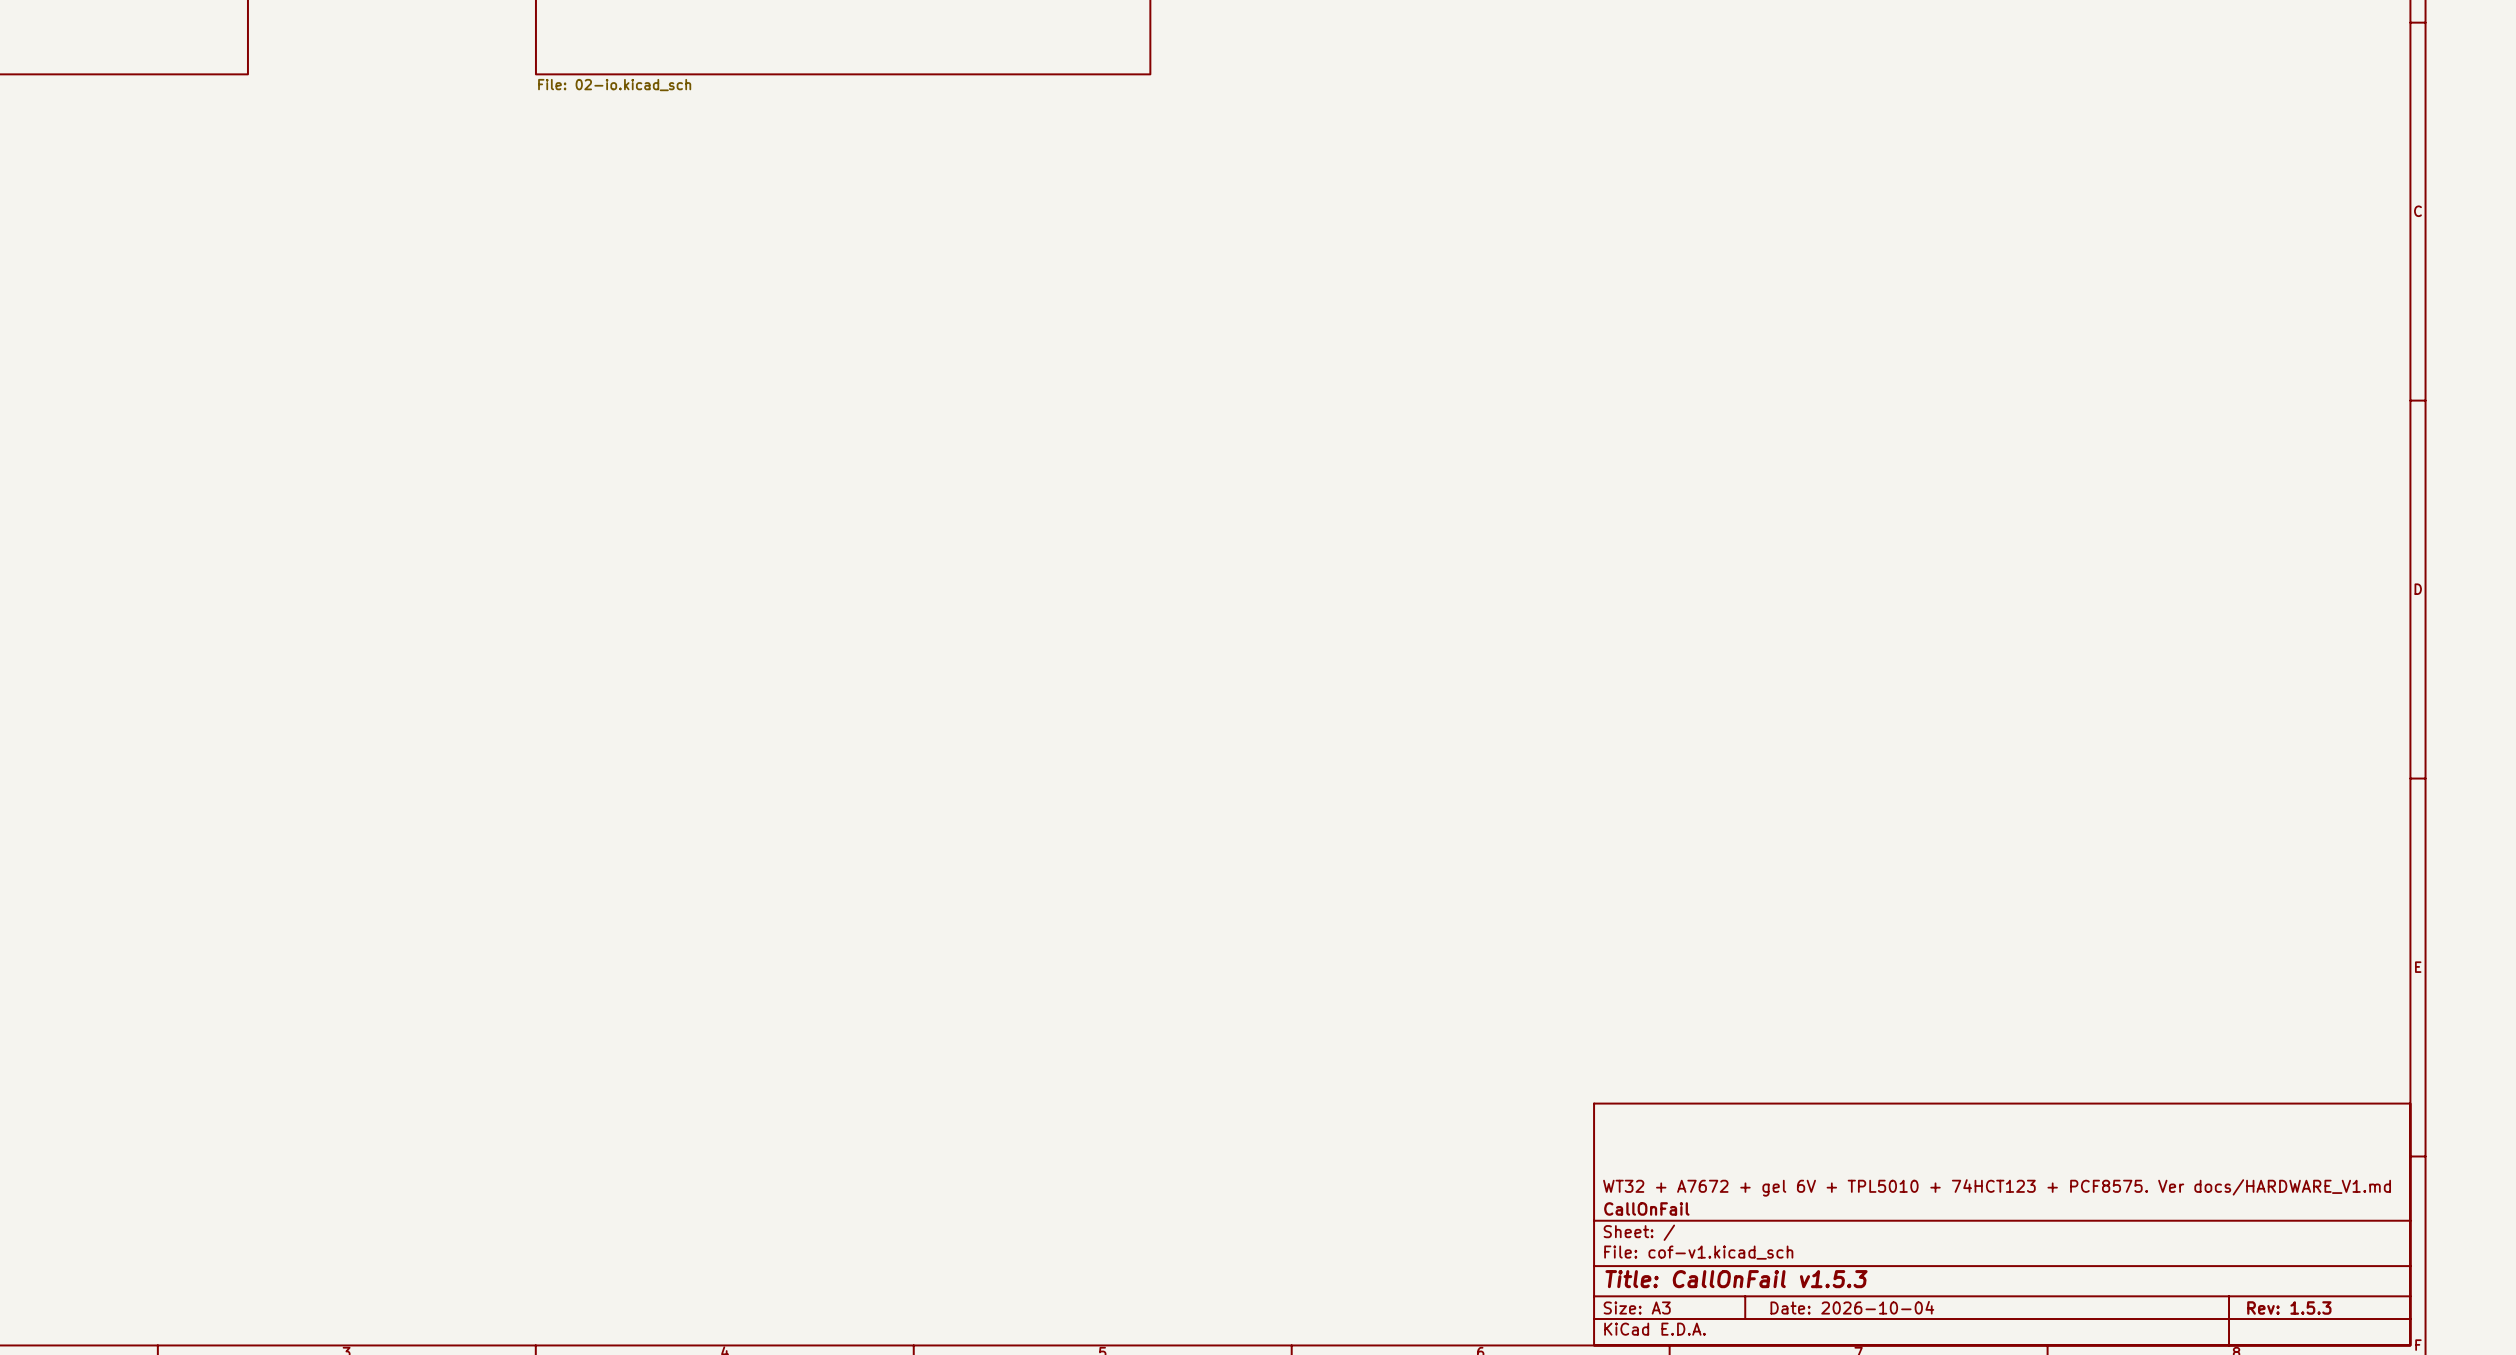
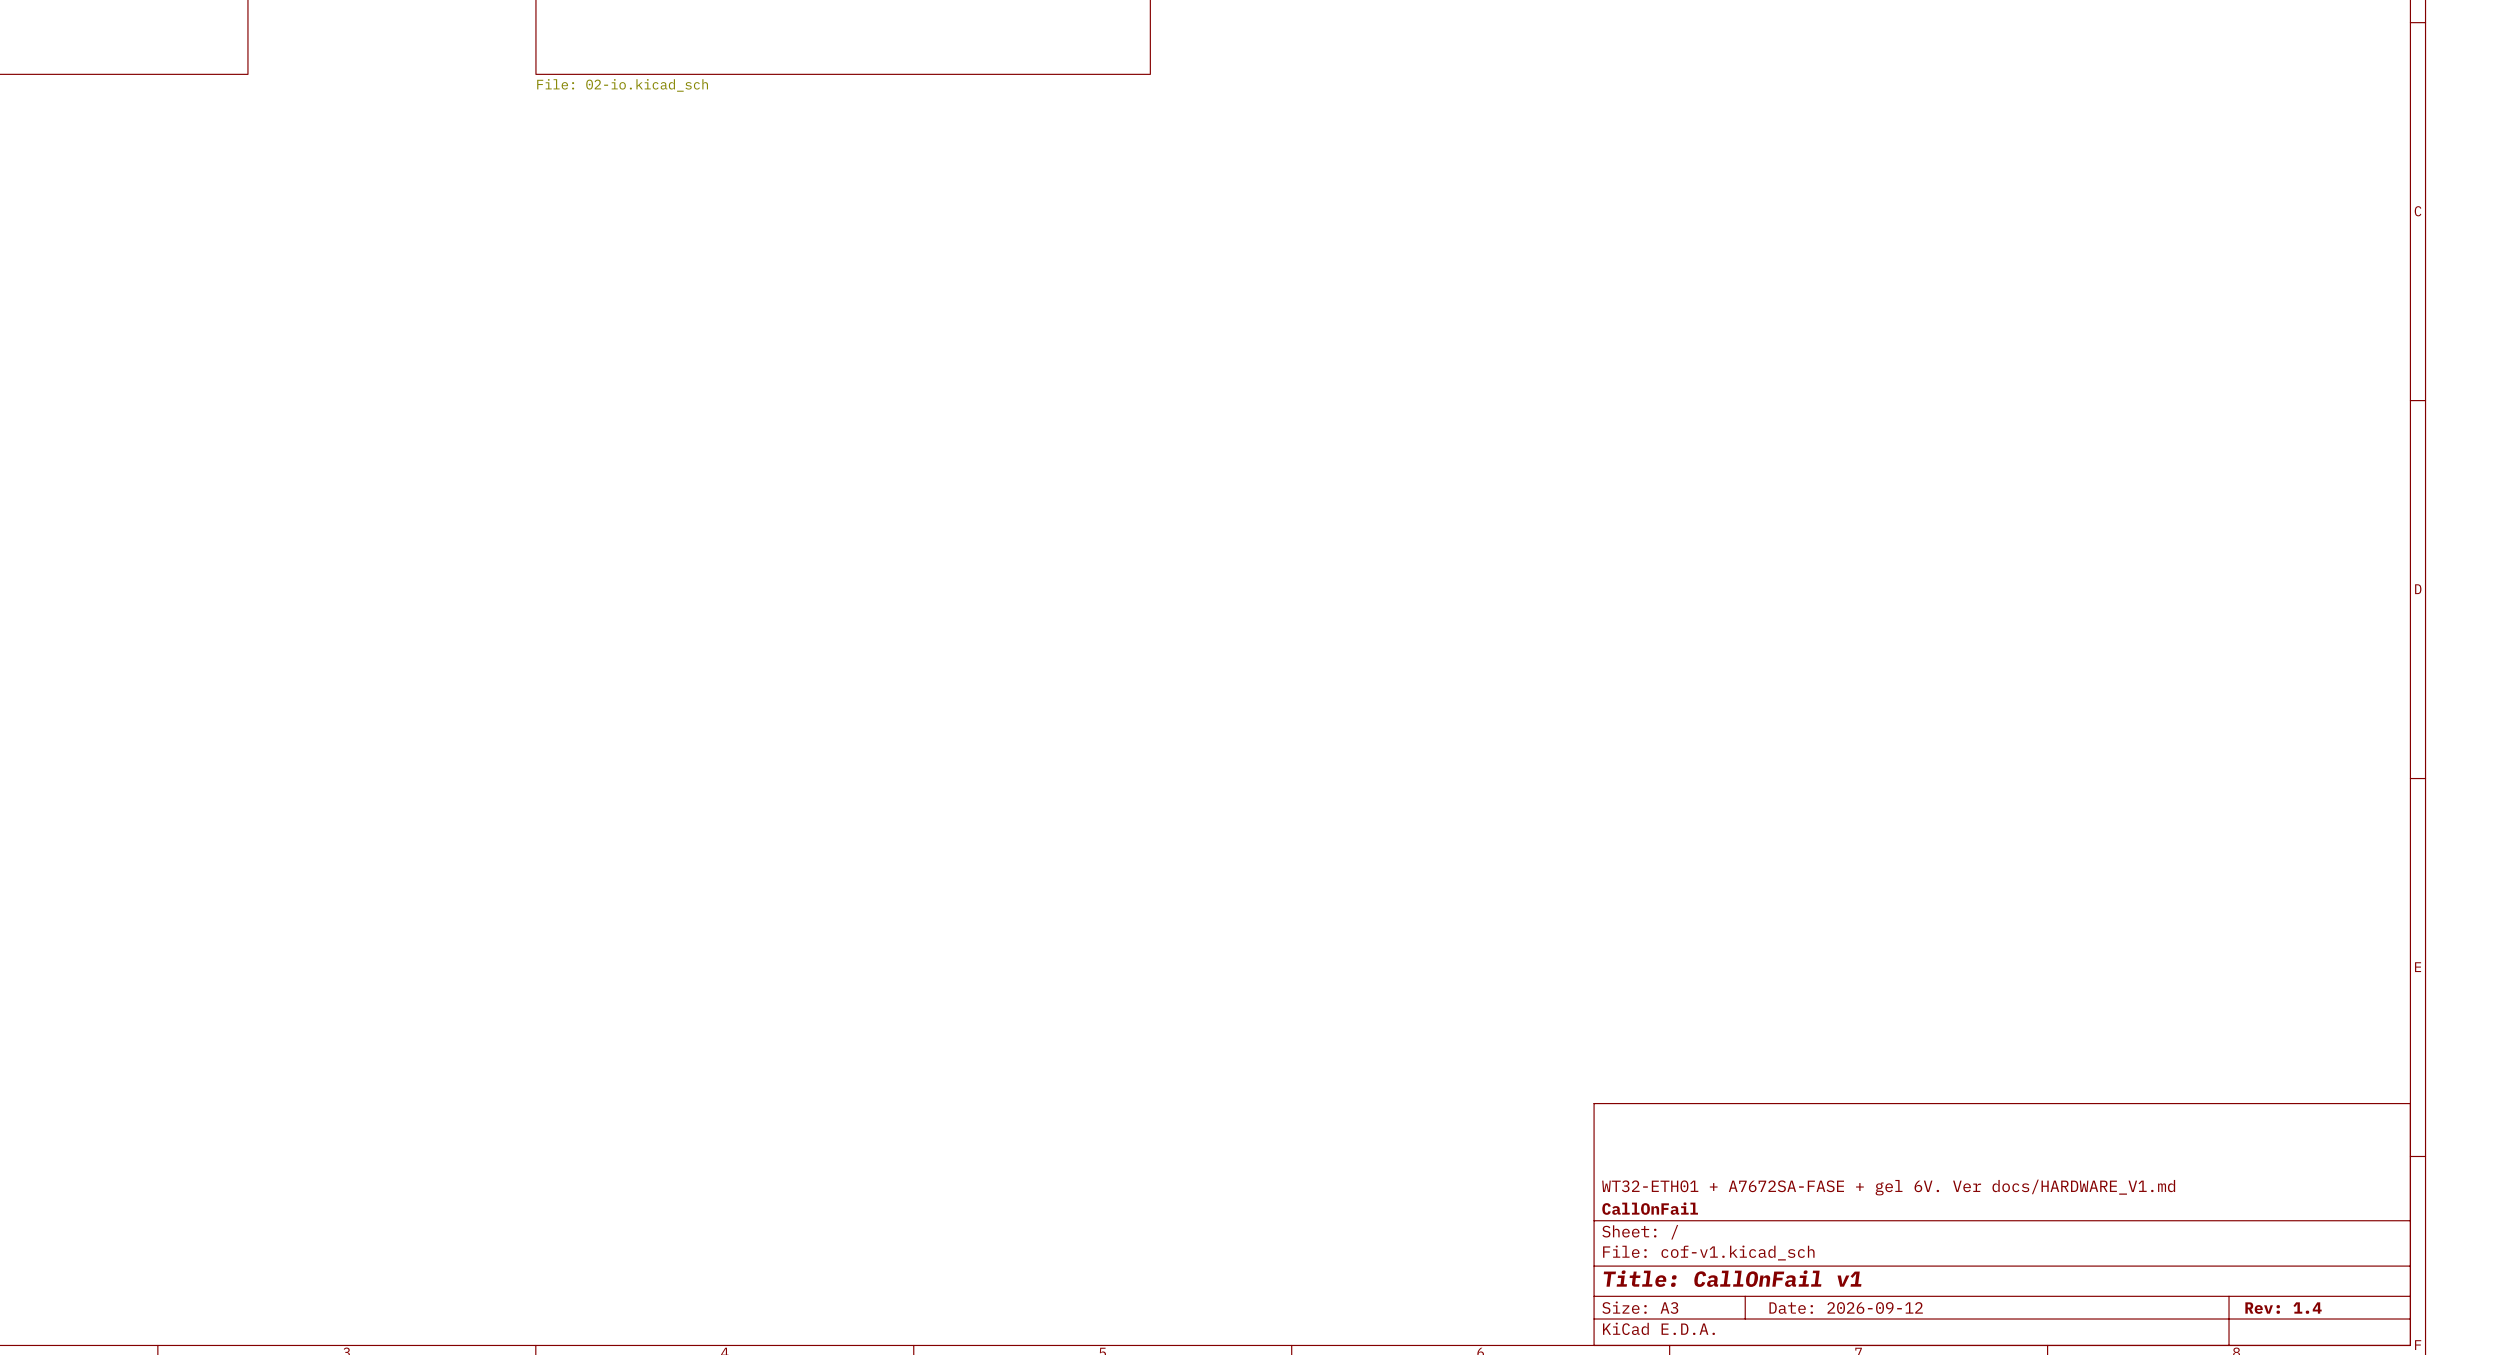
title block: WT32 + A7672 + gel 6V + TPL5010 + 74HCT123 + PCF8575. Ver docs/HARDWARE_V1.md (1997, 1187) -> WT32-ETH01 + A7672SA-FASE + gel 6V. Ver docs/HARDWARE_V1.md (1888, 1187)
title block: Title: CallOnFail v1.5.3 (1736, 1279) -> Title: CallOnFail v1 (1732, 1278)
title block: Date: 2026-10-04 (1852, 1307) -> Date: 2026-09-12 (1846, 1307)
title block: Rev: 1.5.3 (2289, 1307) -> Rev: 1.4 (2283, 1308)

